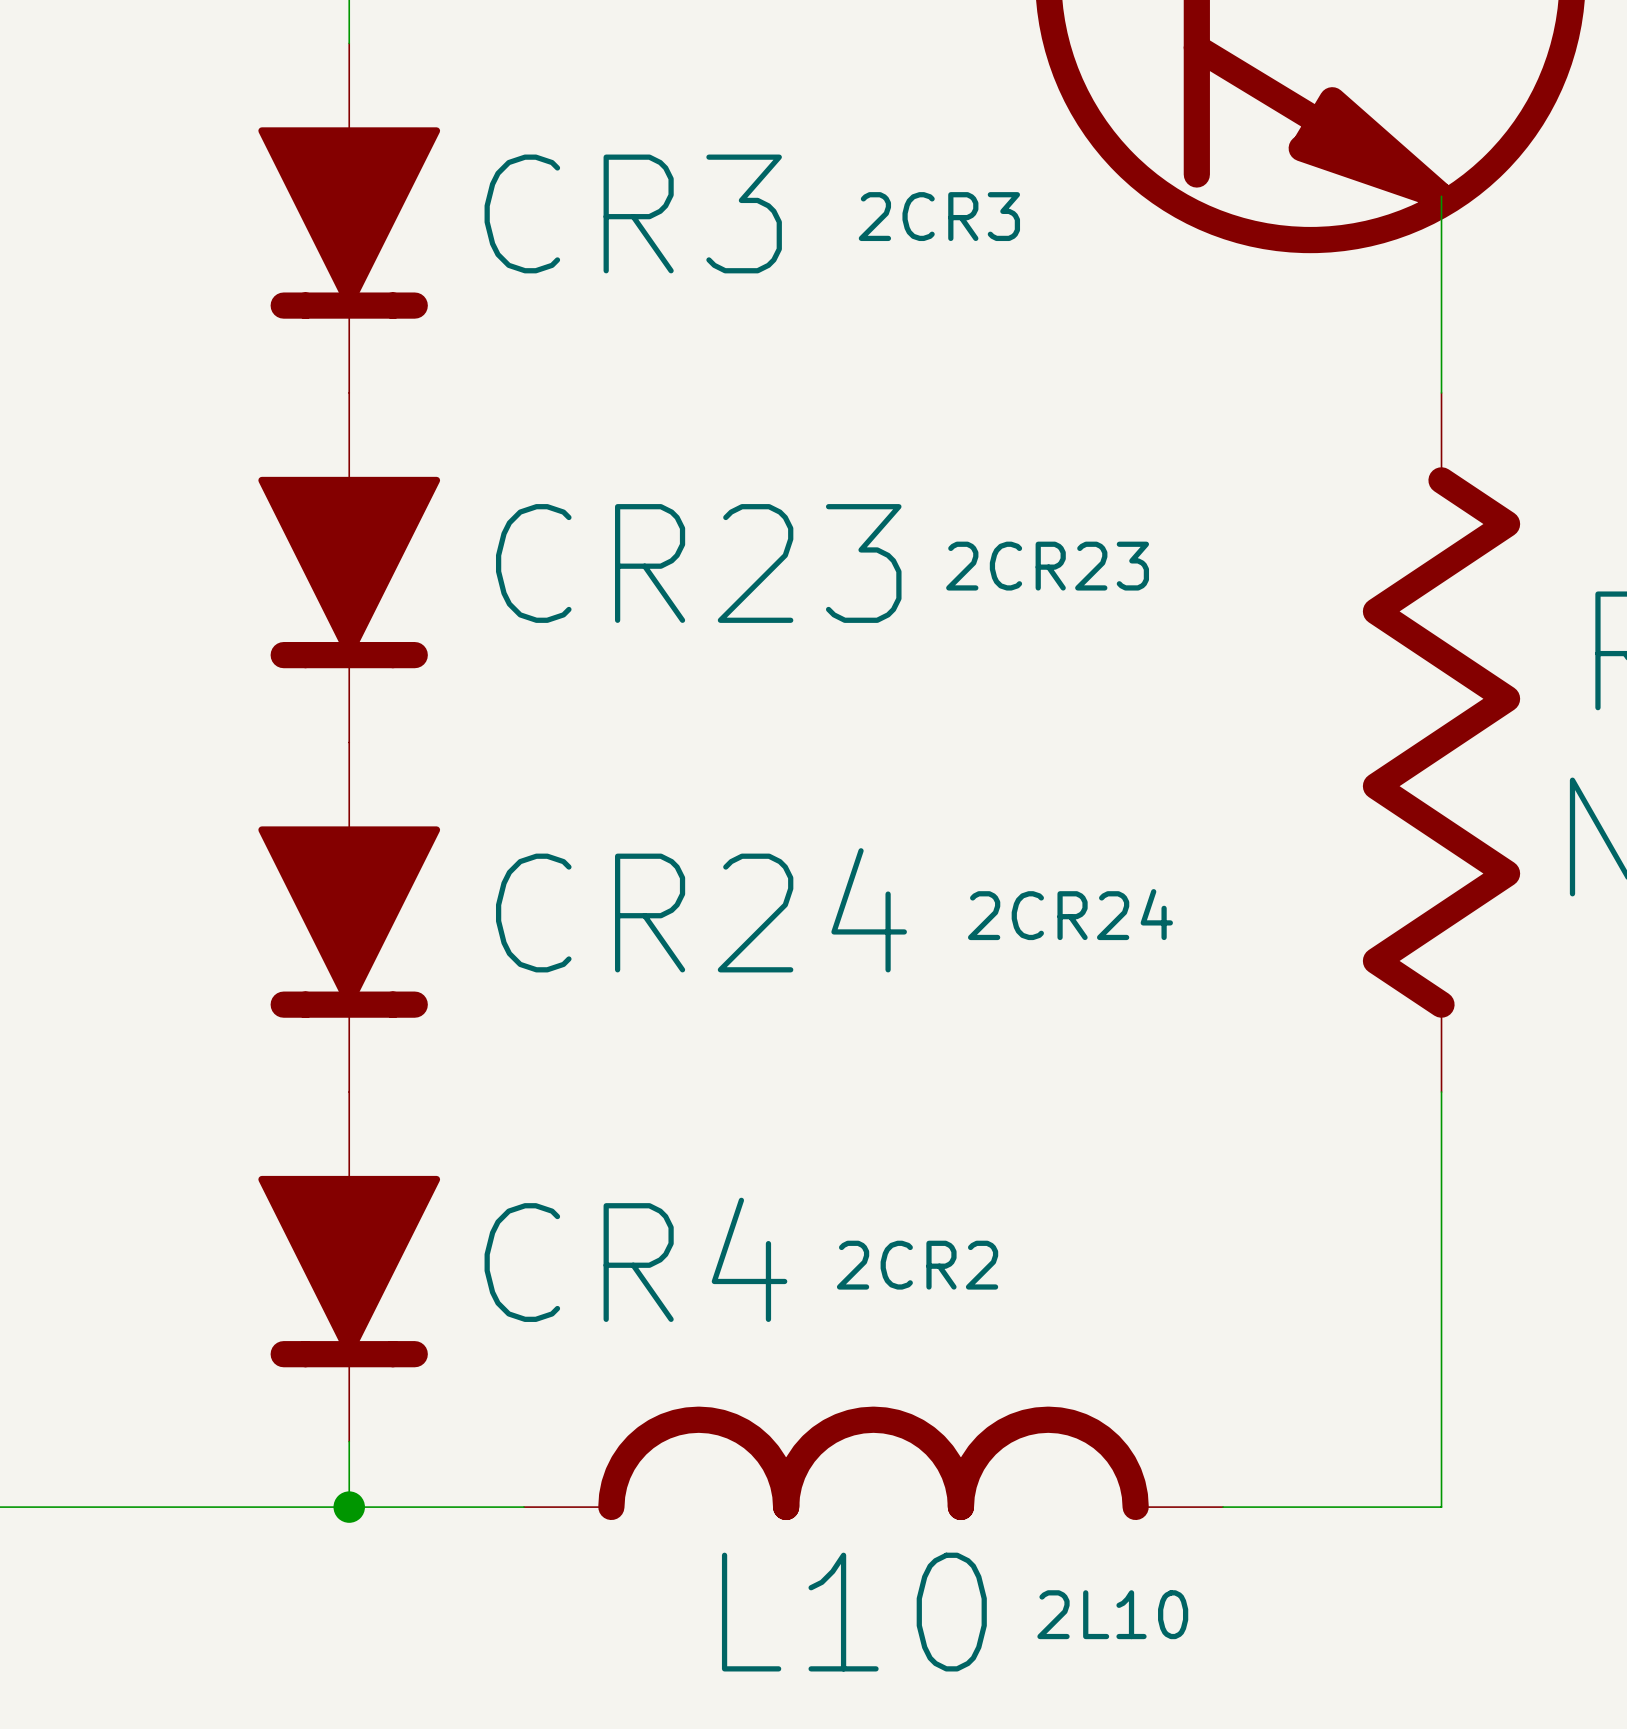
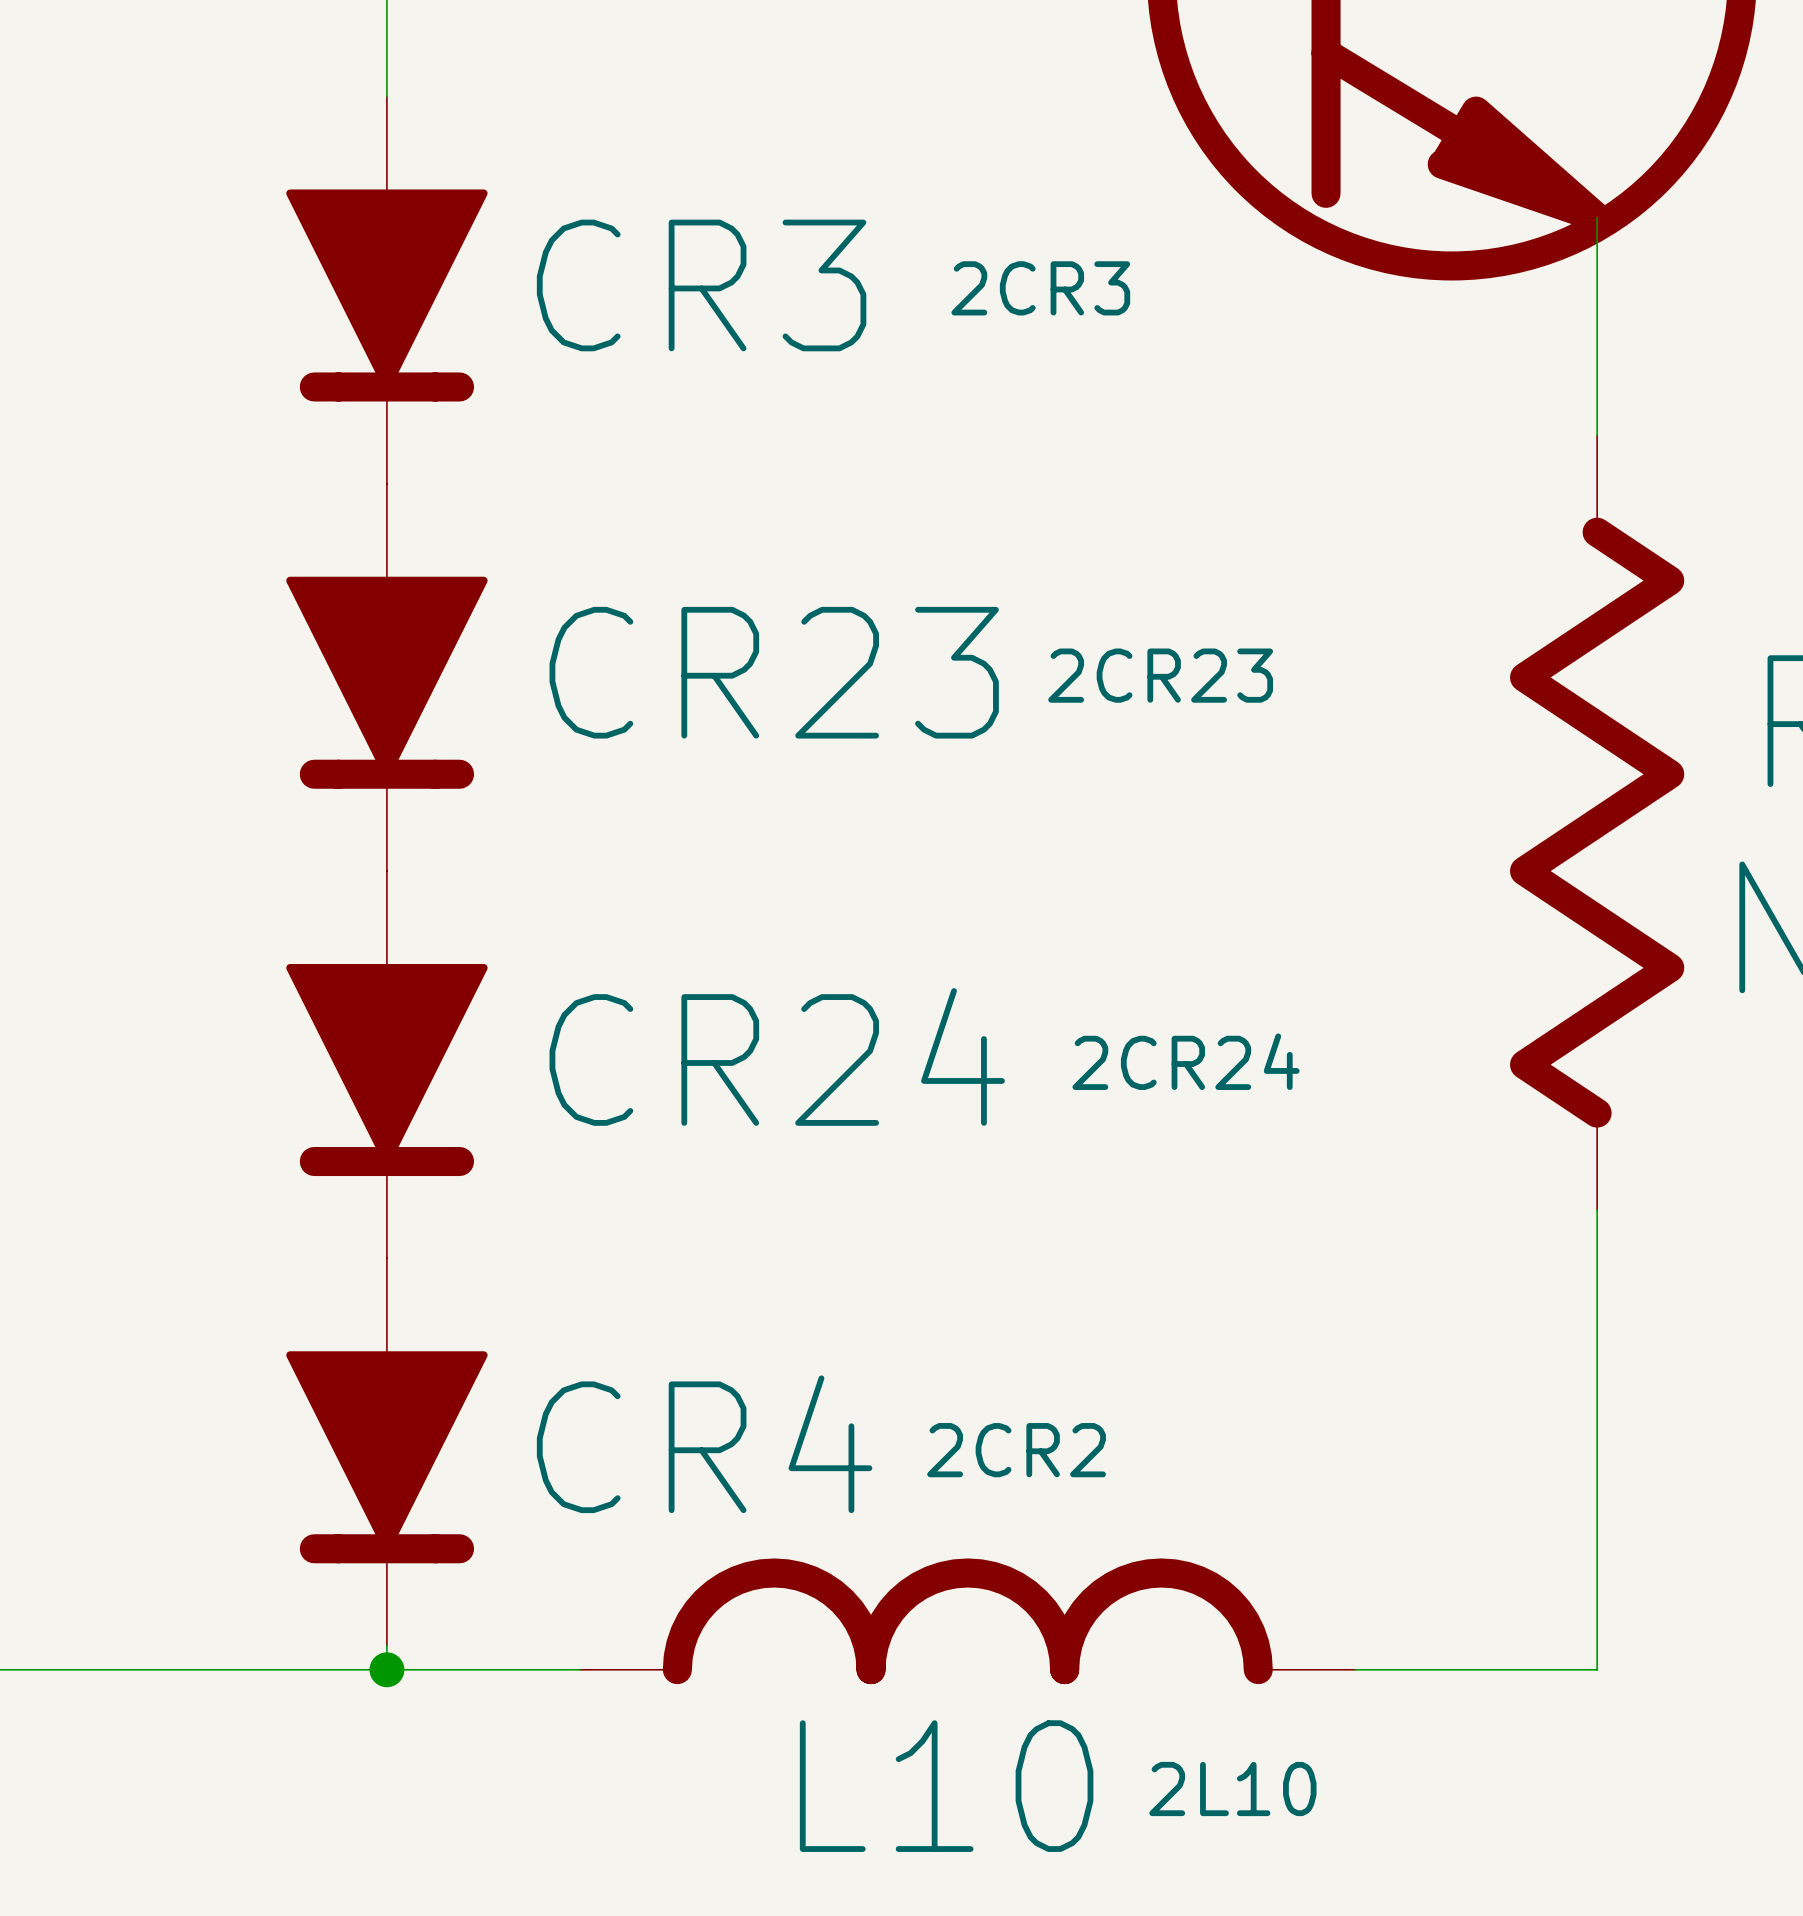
2CR3 position: (349, 218) -> (386, 290)
2CR23 position: (349, 567) -> (386, 677)
2CR24 position: (349, 917) -> (386, 1064)
2CR2 position: (349, 1266) -> (386, 1451)

